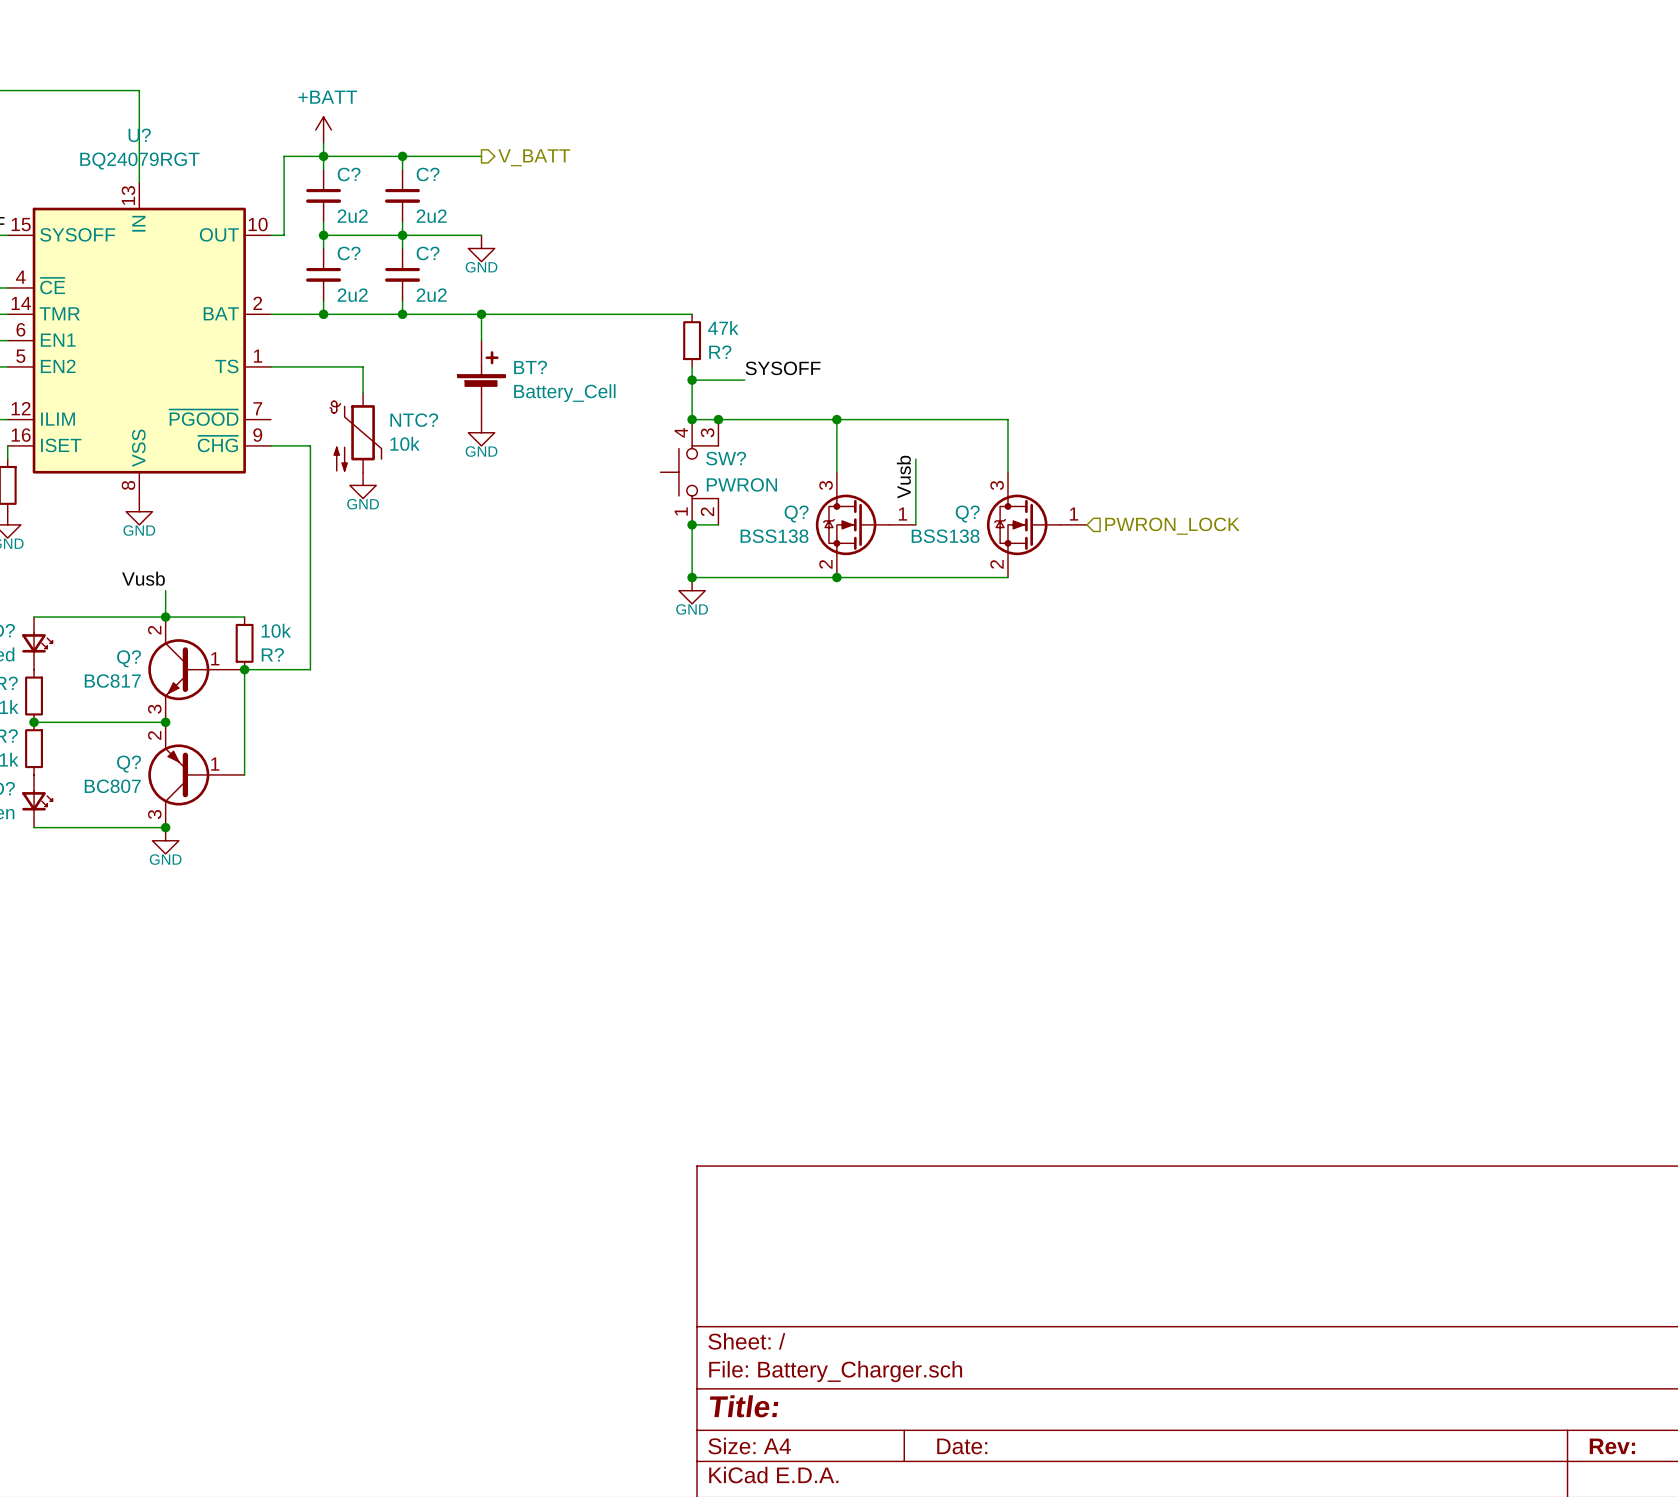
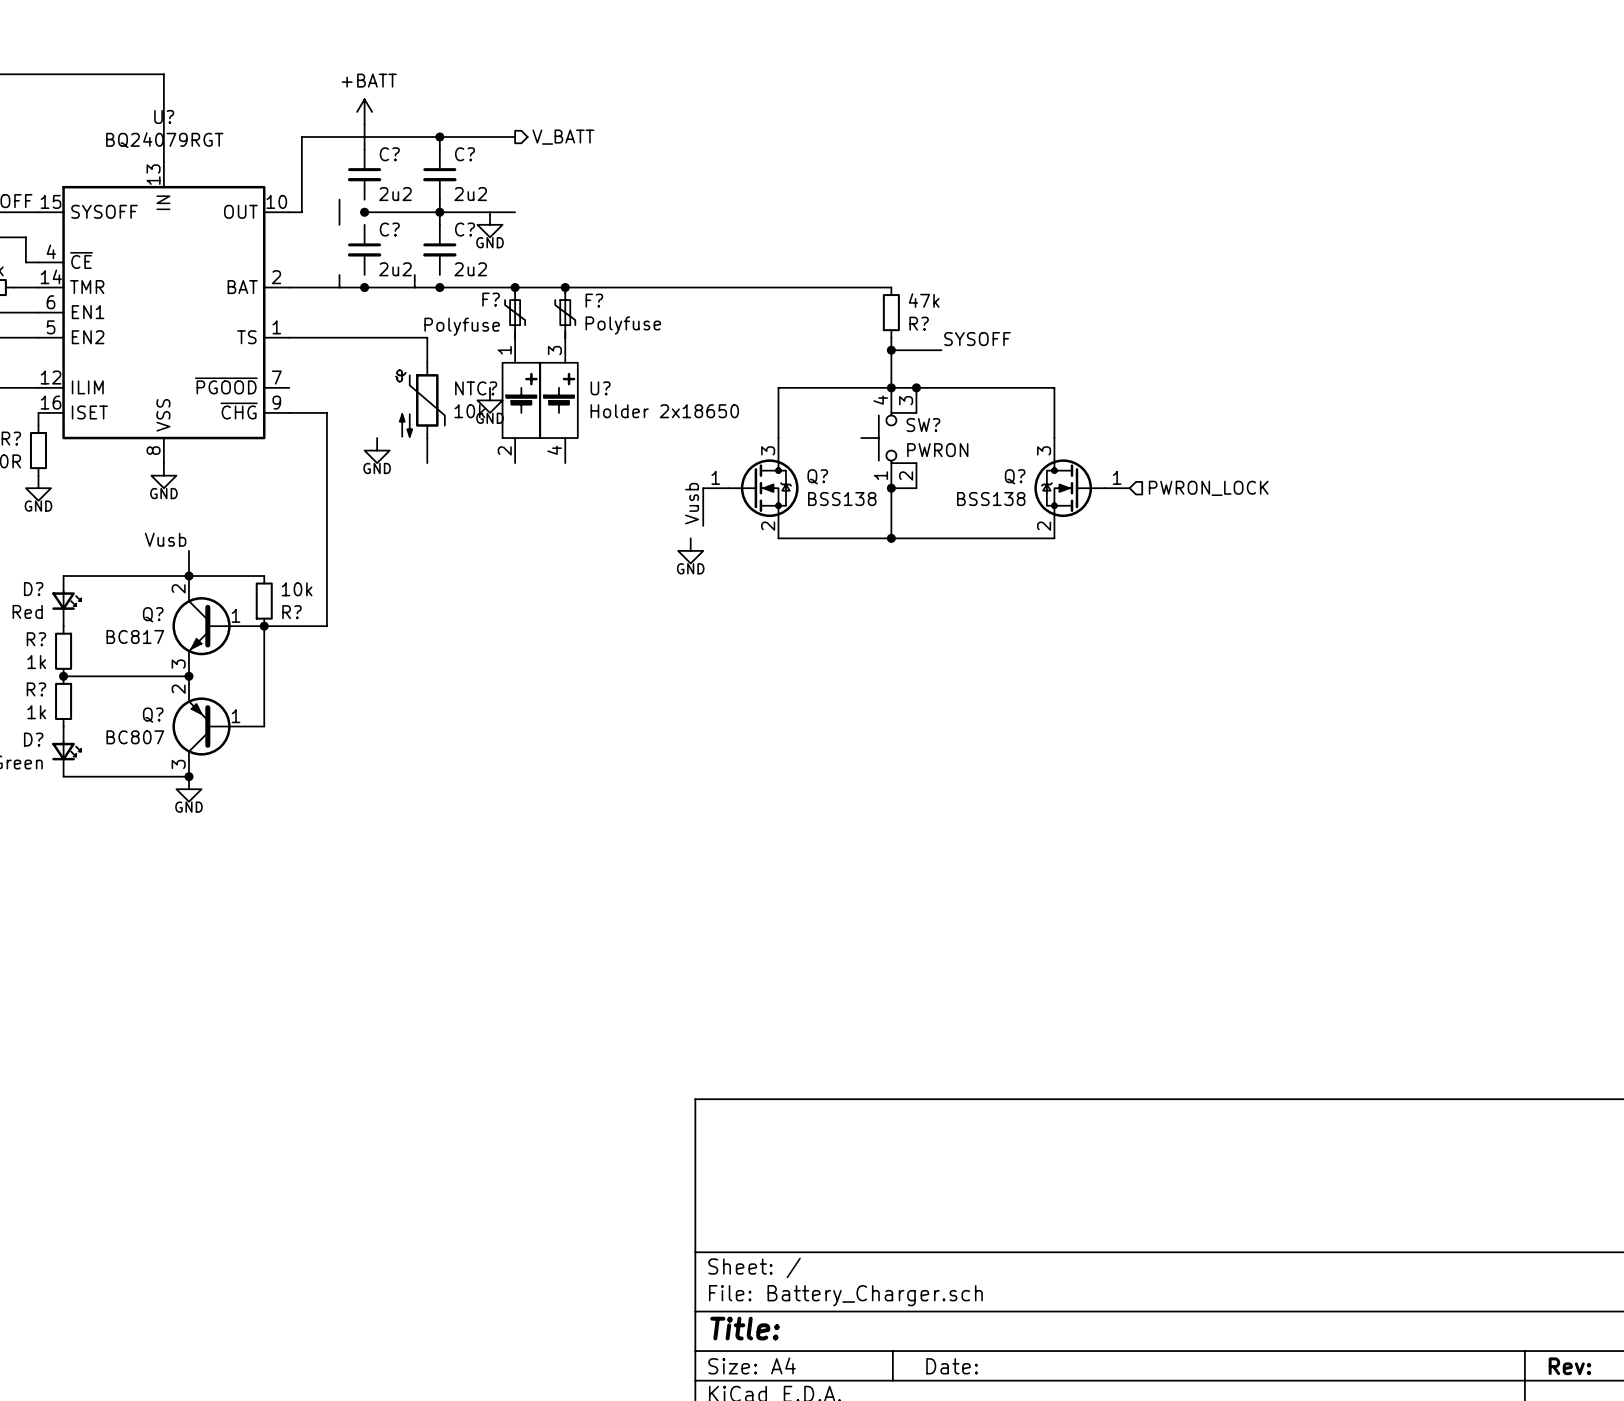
power symbol position: +BATT (323, 130) -> +BATT (364, 111)
wire: (323, 143) (323, 169) -> (364, 124) (364, 149)
junction: (323, 156) -> none
wire: (402, 156) (402, 169) -> (439, 137) (439, 149)
junction position: (402, 156) -> (439, 137)
wire: none -> (490, 137) (515, 137)
hierarchical label position: V_BATT (534, 157) -> V_BATT (563, 137)
C?: 2u2 (323, 195) -> none
C?: none -> 2u2 (364, 174)
C?: 2u2 (402, 195) -> none
C?: none -> 2u2 (439, 174)
wire: (402, 222) (402, 248) -> (439, 199) (439, 224)
wire: (323, 235) (349, 235) -> (490, 212) (515, 212)
junction: (323, 235) -> none
junction: none -> (364, 212)
junction: (402, 235) -> none
junction: none -> (439, 212)
C?: 2u2 (323, 274) -> none
C?: none -> 2u2 (364, 249)
C?: 2u2 (402, 274) -> none
C?: none -> 2u2 (439, 249)
junction: (323, 314) -> none
junction: none -> (364, 287)
junction: (402, 314) -> none
junction: none -> (439, 287)
wire: (481, 314) (481, 340) -> (427, 438) (427, 463)
junction: (481, 314) -> none
junction: none -> (515, 287)
junction: none -> (565, 287)
wire: none -> (690, 287) (891, 287)
F?: none -> Polyfuse (515, 312)
F?: none -> Polyfuse (565, 312)
R? position: (692, 340) -> (891, 312)
wire: (363, 366) (363, 393) -> (377, 337) (427, 337) (427, 362)
wire: (692, 366) (692, 419) (784, 419) -> (778, 438) (778, 387)
label position: SYSOFF (783, 368) -> SYSOFF (977, 339)
BT?: Battery_Cell (481, 380) -> none
wire: (692, 380) (744, 380) -> (891, 350) (941, 350)
junction: (692, 380) -> none
junction: none -> (891, 350)
junction: (692, 419) -> none
junction: (718, 419) -> none
wire: (836, 419) (836, 472) -> (891, 337) (891, 387)
junction: (836, 419) -> none
junction: none -> (891, 387)
junction: none -> (916, 387)
wire: (1007, 419) (1007, 472) -> (991, 387) (1054, 387) (1054, 438)
NTC? position: (355, 432) -> (420, 400)
U?: none -> Holder 2x18650 (540, 400)
wire: (915, 459) (915, 524) -> none
SW? position: (689, 472) -> (888, 438)
label position: Vusb (903, 477) -> Vusb (692, 503)
junction: (692, 524) -> none
wire: none -> (703, 488) (703, 525)
wire: (718, 524) (692, 524) (692, 577) (784, 577) -> none
Q?: none -> BSS138 (750, 488)
Q?: BSS138 (865, 524) -> none
junction: none -> (891, 488)
wire: none -> (916, 488) (891, 488) (891, 538)
Q? position: (1036, 524) -> (1082, 488)
hierarchical label position: PWRON_LOCK (1172, 526) -> PWRON_LOCK (1208, 488)
junction: (692, 577) -> none
junction: (836, 577) -> none
junction: none -> (891, 538)
wire: none -> (991, 538) (1054, 538)

